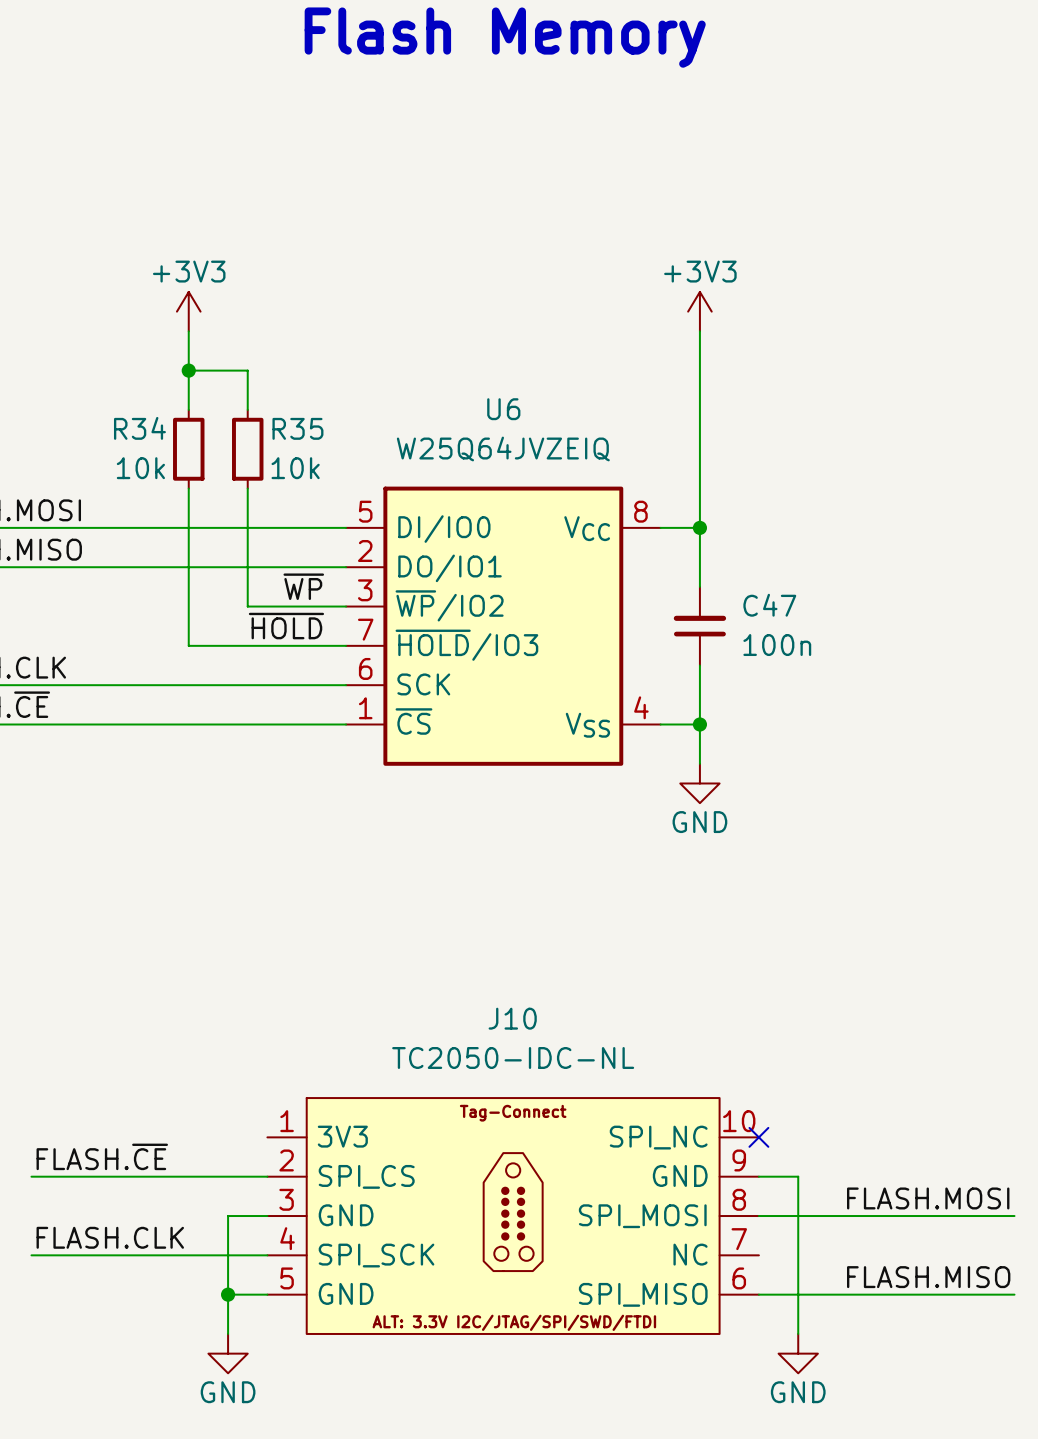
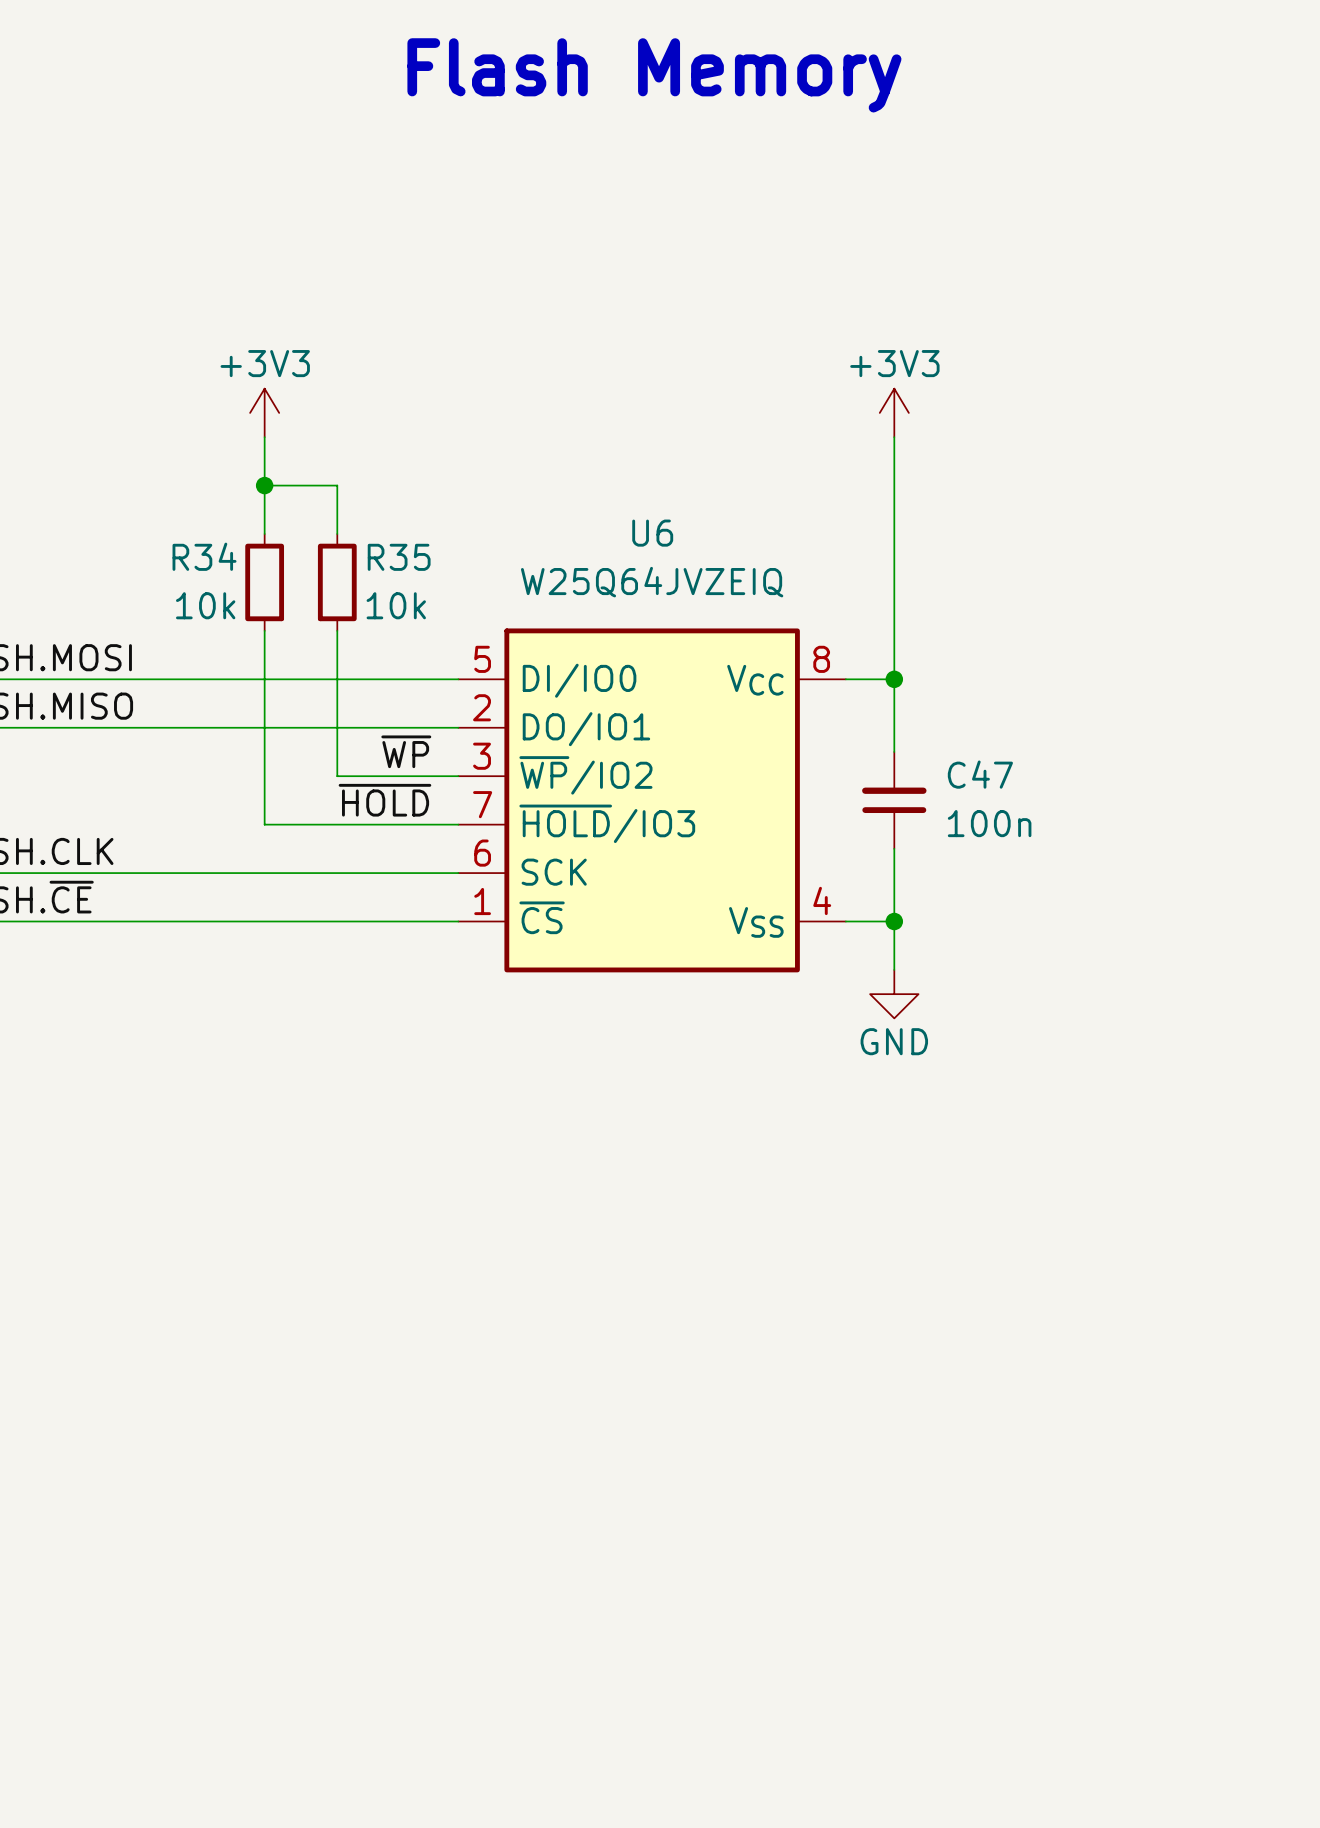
no-connect mark: (758, 1137) -> none
label: FLASH.~{CE} (102, 1156) -> none
wire: (31, 1176) (267, 1176) -> none
wire: (758, 1176) (798, 1176) (798, 1333) -> none
label: FLASH.MOSI (928, 1198) -> none
wire: (267, 1216) (228, 1216) (228, 1333) -> none
J10: (513, 1216) -> none
wire: (758, 1216) (1014, 1216) -> none
label: FLASH.CLK (110, 1237) -> none
wire: (31, 1255) (267, 1255) -> none
label: FLASH.MISO (928, 1277) -> none
wire: (228, 1294) (267, 1294) -> none
junction: (228, 1294) -> none
wire: (758, 1294) (1014, 1294) -> none
power symbol: GND (228, 1353) -> none
power symbol: GND (798, 1353) -> none

